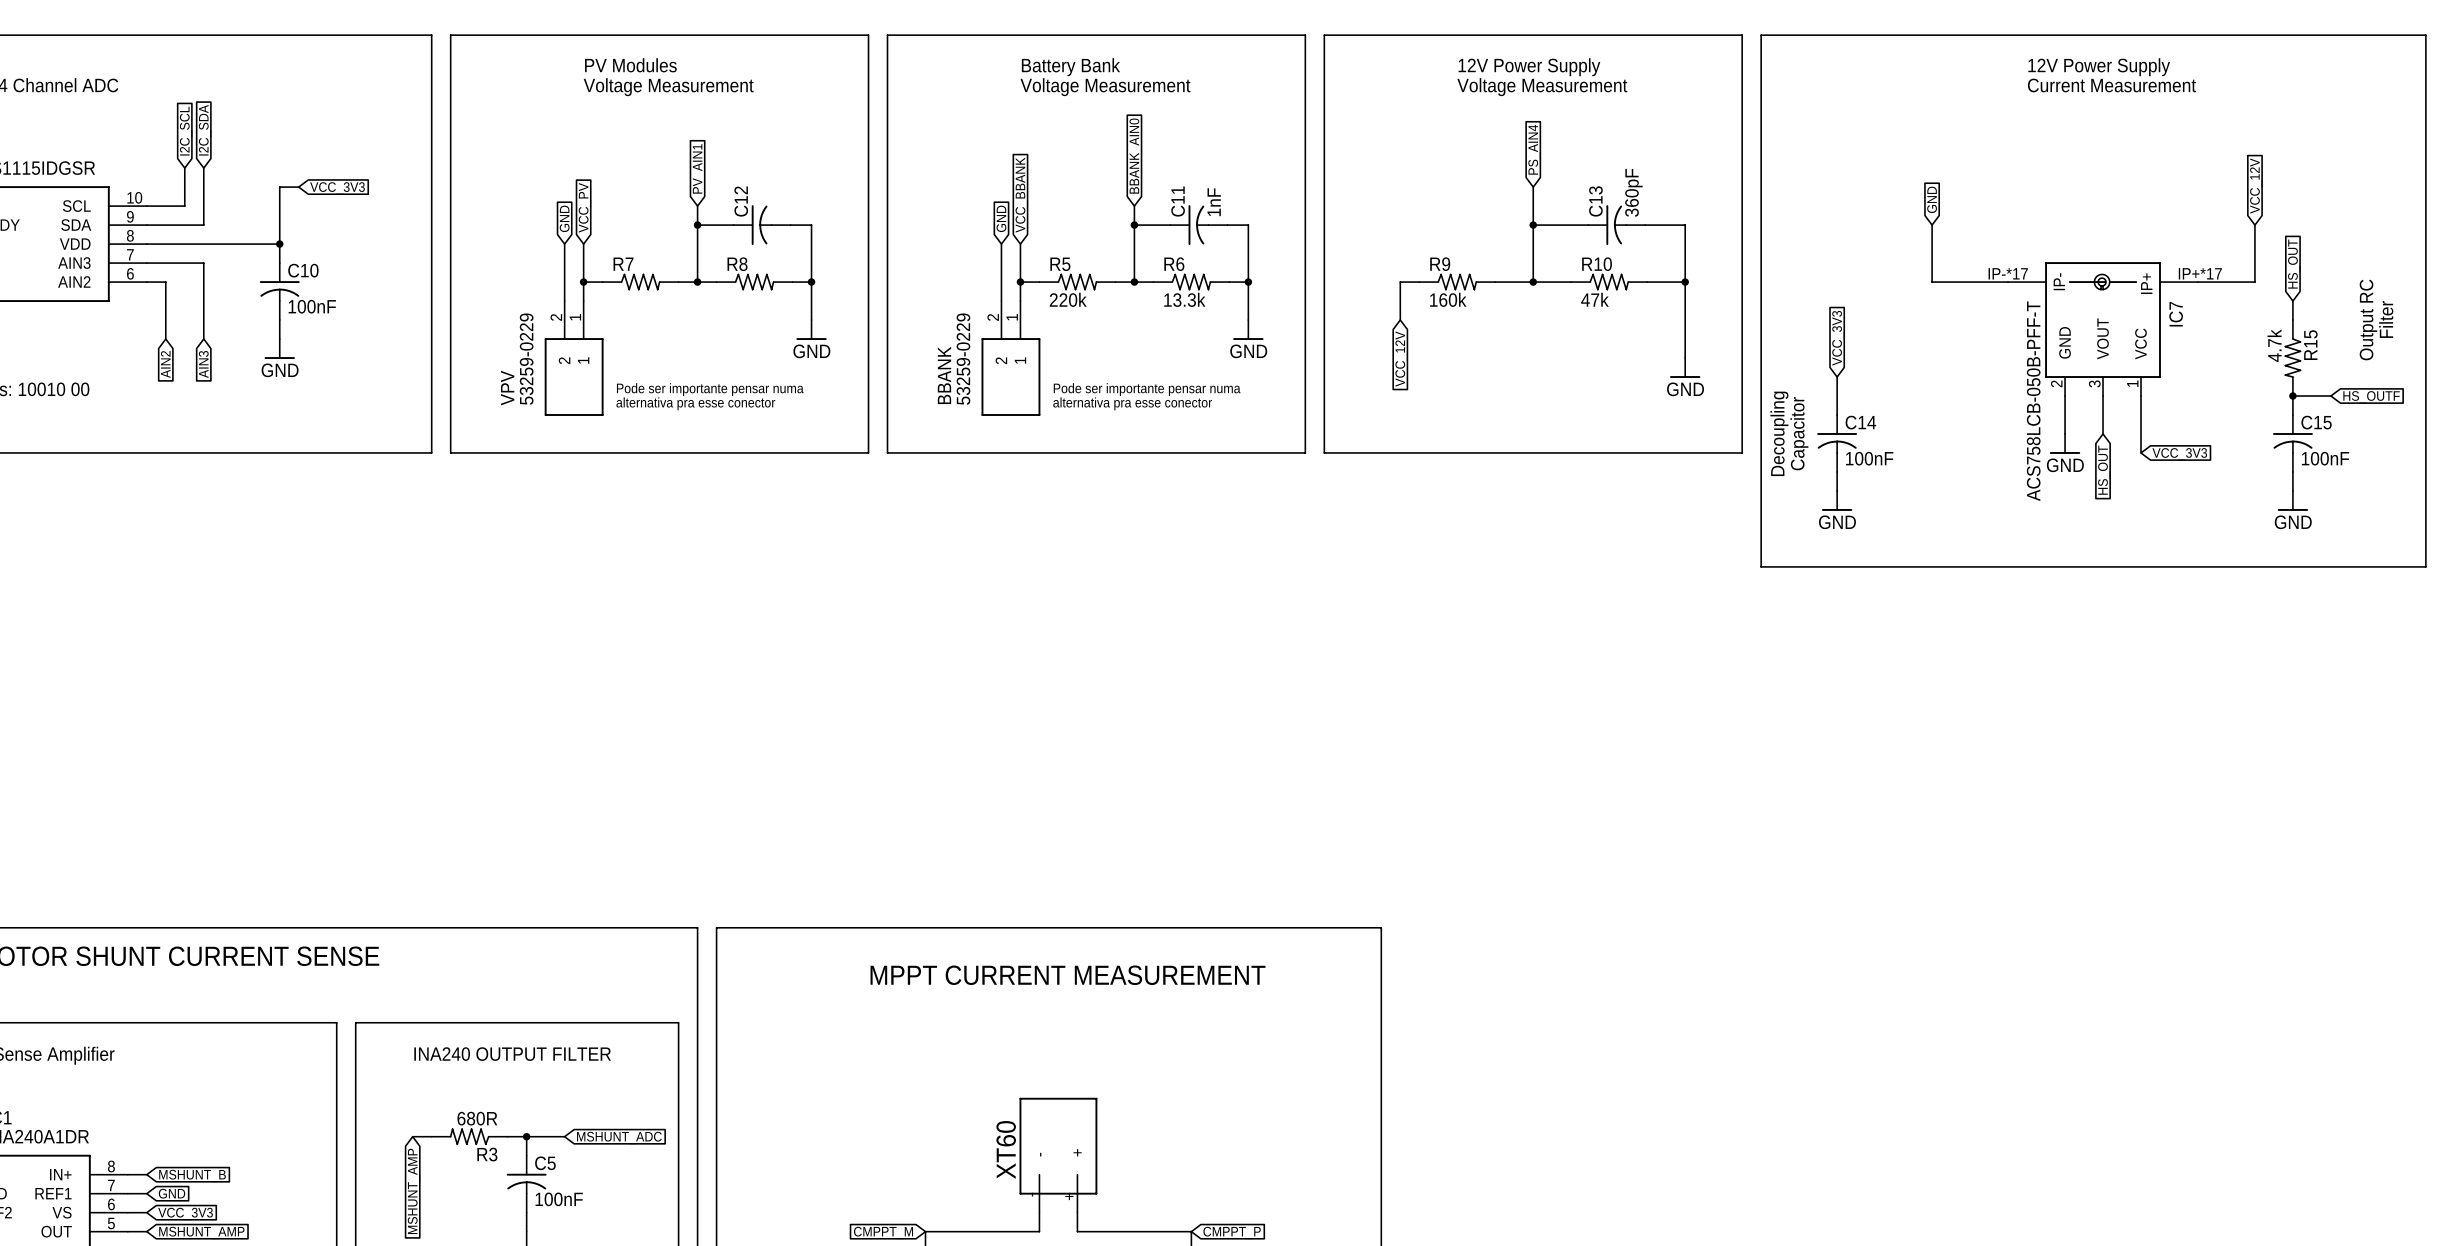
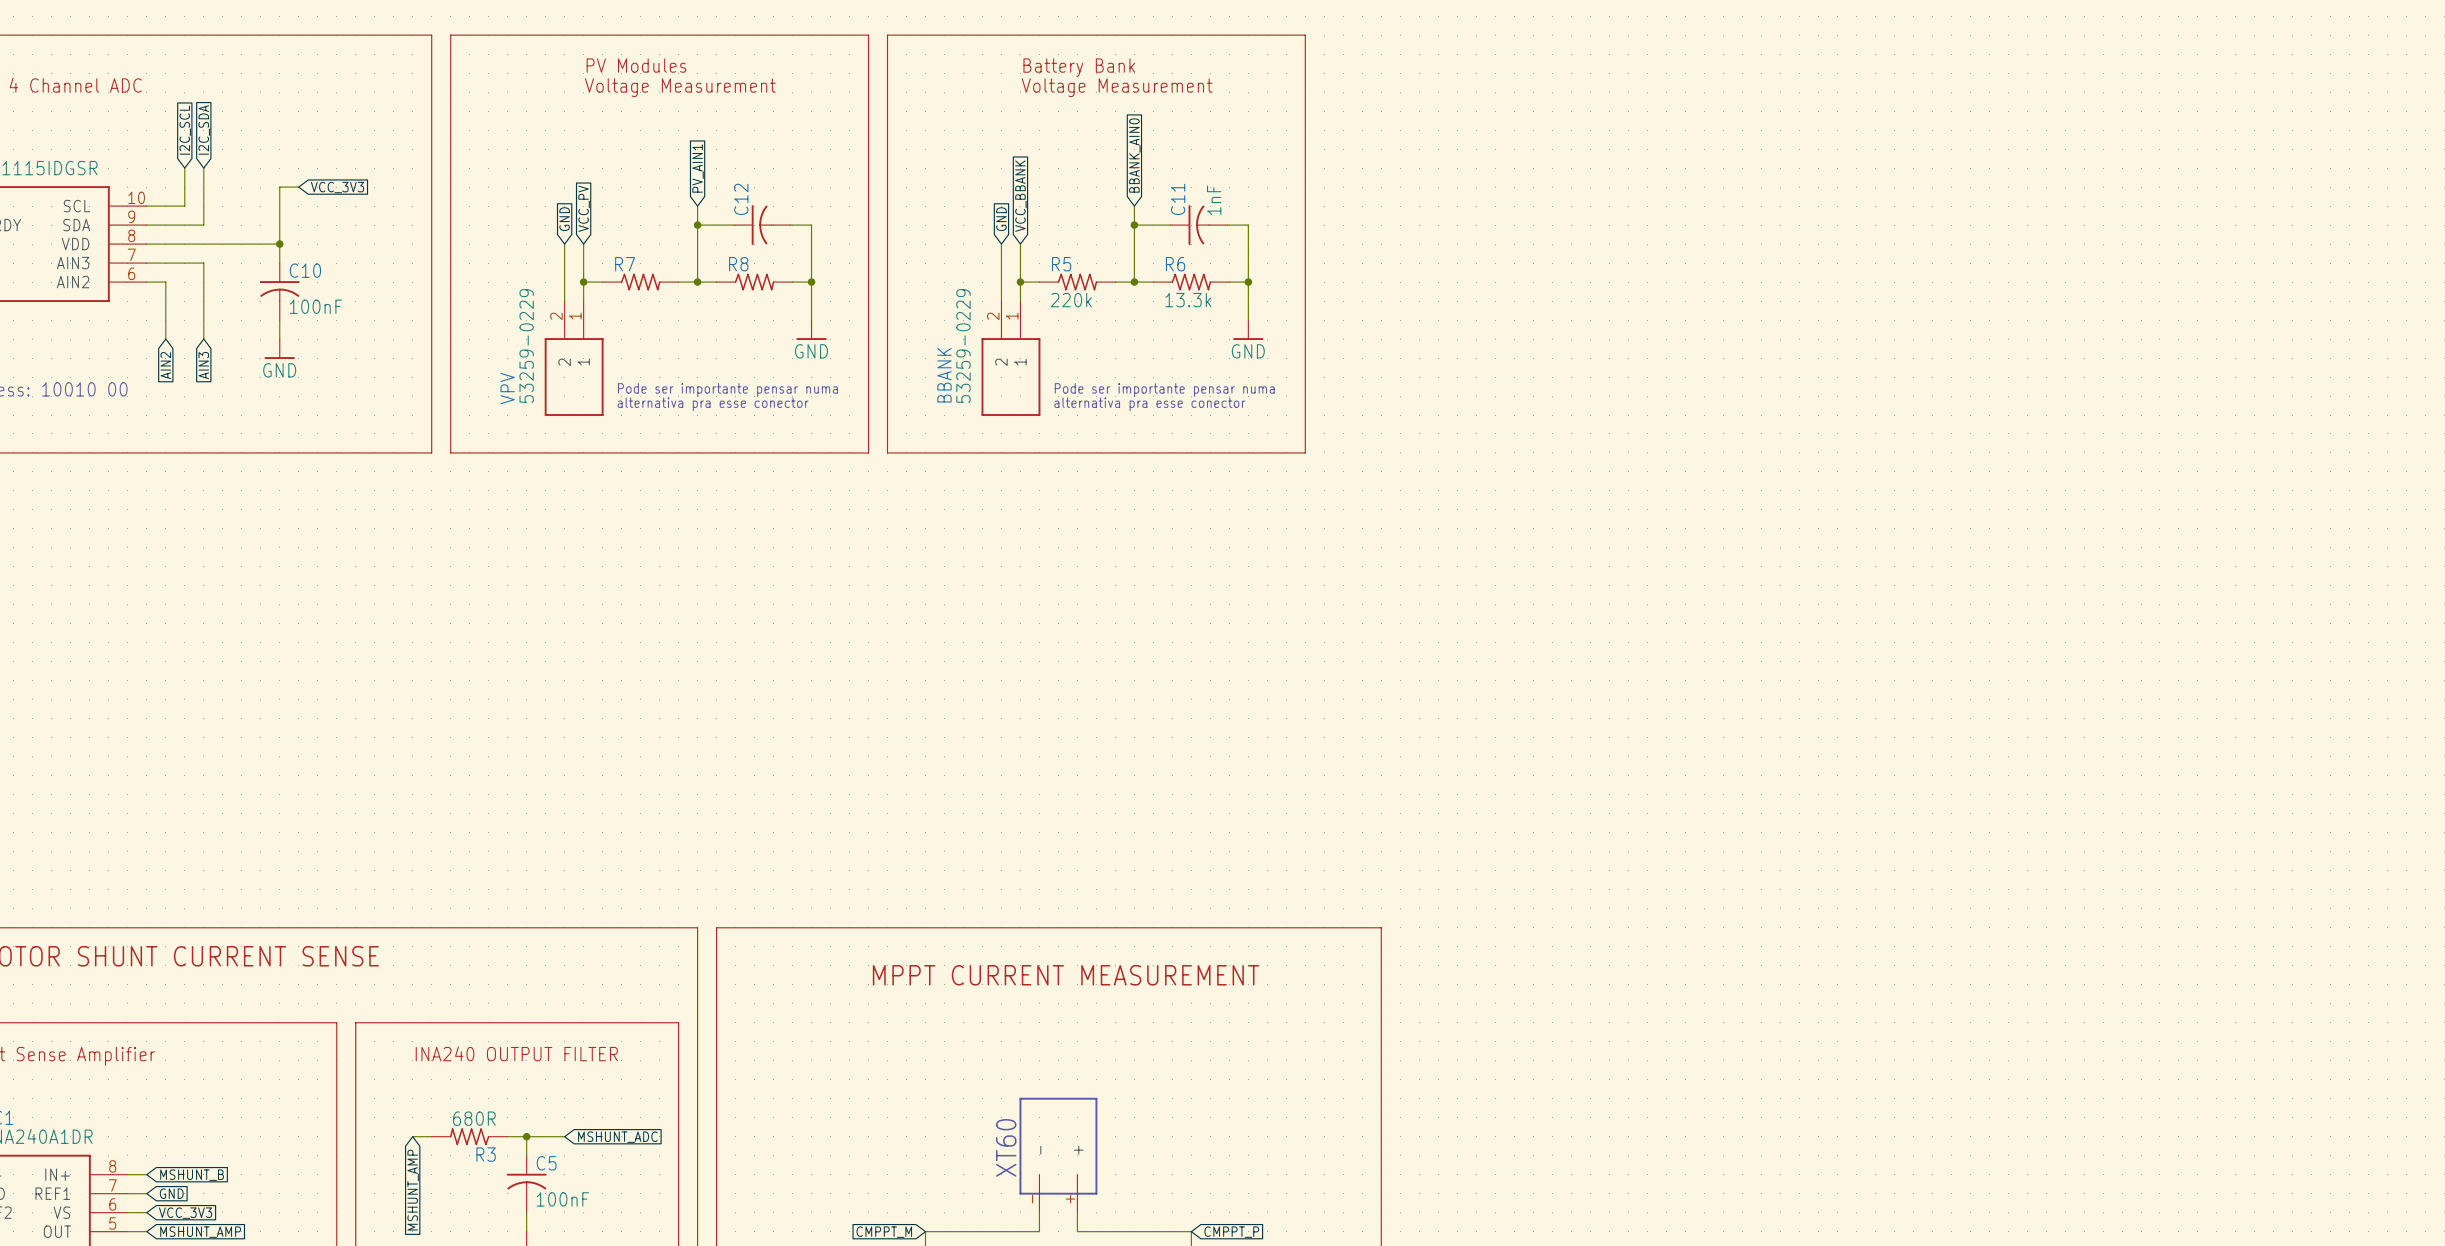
line: (1324, 35) (1324, 452) (1742, 452) (1742, 35) (1324, 35) -> none
line: (1761, 35) (2425, 35) (2425, 566) (1761, 566) (1761, 35) -> none
text: 12V Power Supply (1529, 67) -> none
text: 12V Power Supply (2099, 67) -> none
text: Current Measurement (2112, 85) -> none
text: Voltage Measurement (1542, 87) -> none
global label: PS_AIN4 (1534, 149) -> none
global label: VCC_12V (2256, 186) -> none
wire: (1533, 187) (1533, 282) -> none
global label: GND (1932, 199) -> none
wire: (1533, 225) (1588, 225) -> none
junction: (1533, 225) -> none
C13: 360pF (1616, 225) -> none
wire: (1645, 225) (1685, 225) (1685, 358) -> none
wire: (1932, 225) (1932, 282) (2008, 282) -> none
wire: (2254, 225) (2254, 282) (2197, 282) -> none
global label: HS_OUT (2294, 264) -> none
wire: (1419, 282) (1400, 282) (1400, 320) -> none
R9: 160k (1457, 282) -> none
wire: (1495, 282) (1571, 282) -> none
junction: (1533, 282) -> none
R10: 47k (1609, 282) -> none
wire: (1647, 282) (1685, 282) -> none
junction: (1685, 282) -> none
wire: (2292, 301) (2292, 320) -> none
text: Output RC (2368, 319) -> none
text: Filter (2386, 319) -> none
IC7: ACS758LCB-050B-PFF-T (2103, 329) -> none
global label: VCC_3V3 (1838, 338) -> none
R15: 4.7k (2292, 358) -> none
global label: VCC_12V (1401, 359) -> none
power symbol: GND (1685, 367) -> none
wire: (1837, 377) (1837, 415) -> none
wire: (2065, 396) (2065, 433) -> none
wire: (2103, 396) (2103, 433) -> none
wire: (2141, 396) (2141, 452) -> none
junction: (2292, 396) -> none
wire: (2330, 396) (2292, 396) (2292, 415) -> none
global label: HS_OUTF (2371, 397) -> none
text: Decoupling (1779, 433) -> none
text: Capacitor (1799, 433) -> none
C14: 100nF (1837, 443) -> none
power symbol: GND (2065, 443) -> none
C15: 100nF (2292, 443) -> none
global label: VCC_3V3 (2179, 454) -> none
global label: HS_OUT (2104, 470) -> none
wire: (1837, 471) (1837, 490) -> none
wire: (2292, 471) (2292, 490) -> none
power symbol: GND (1837, 500) -> none
power symbol: GND (2292, 500) -> none

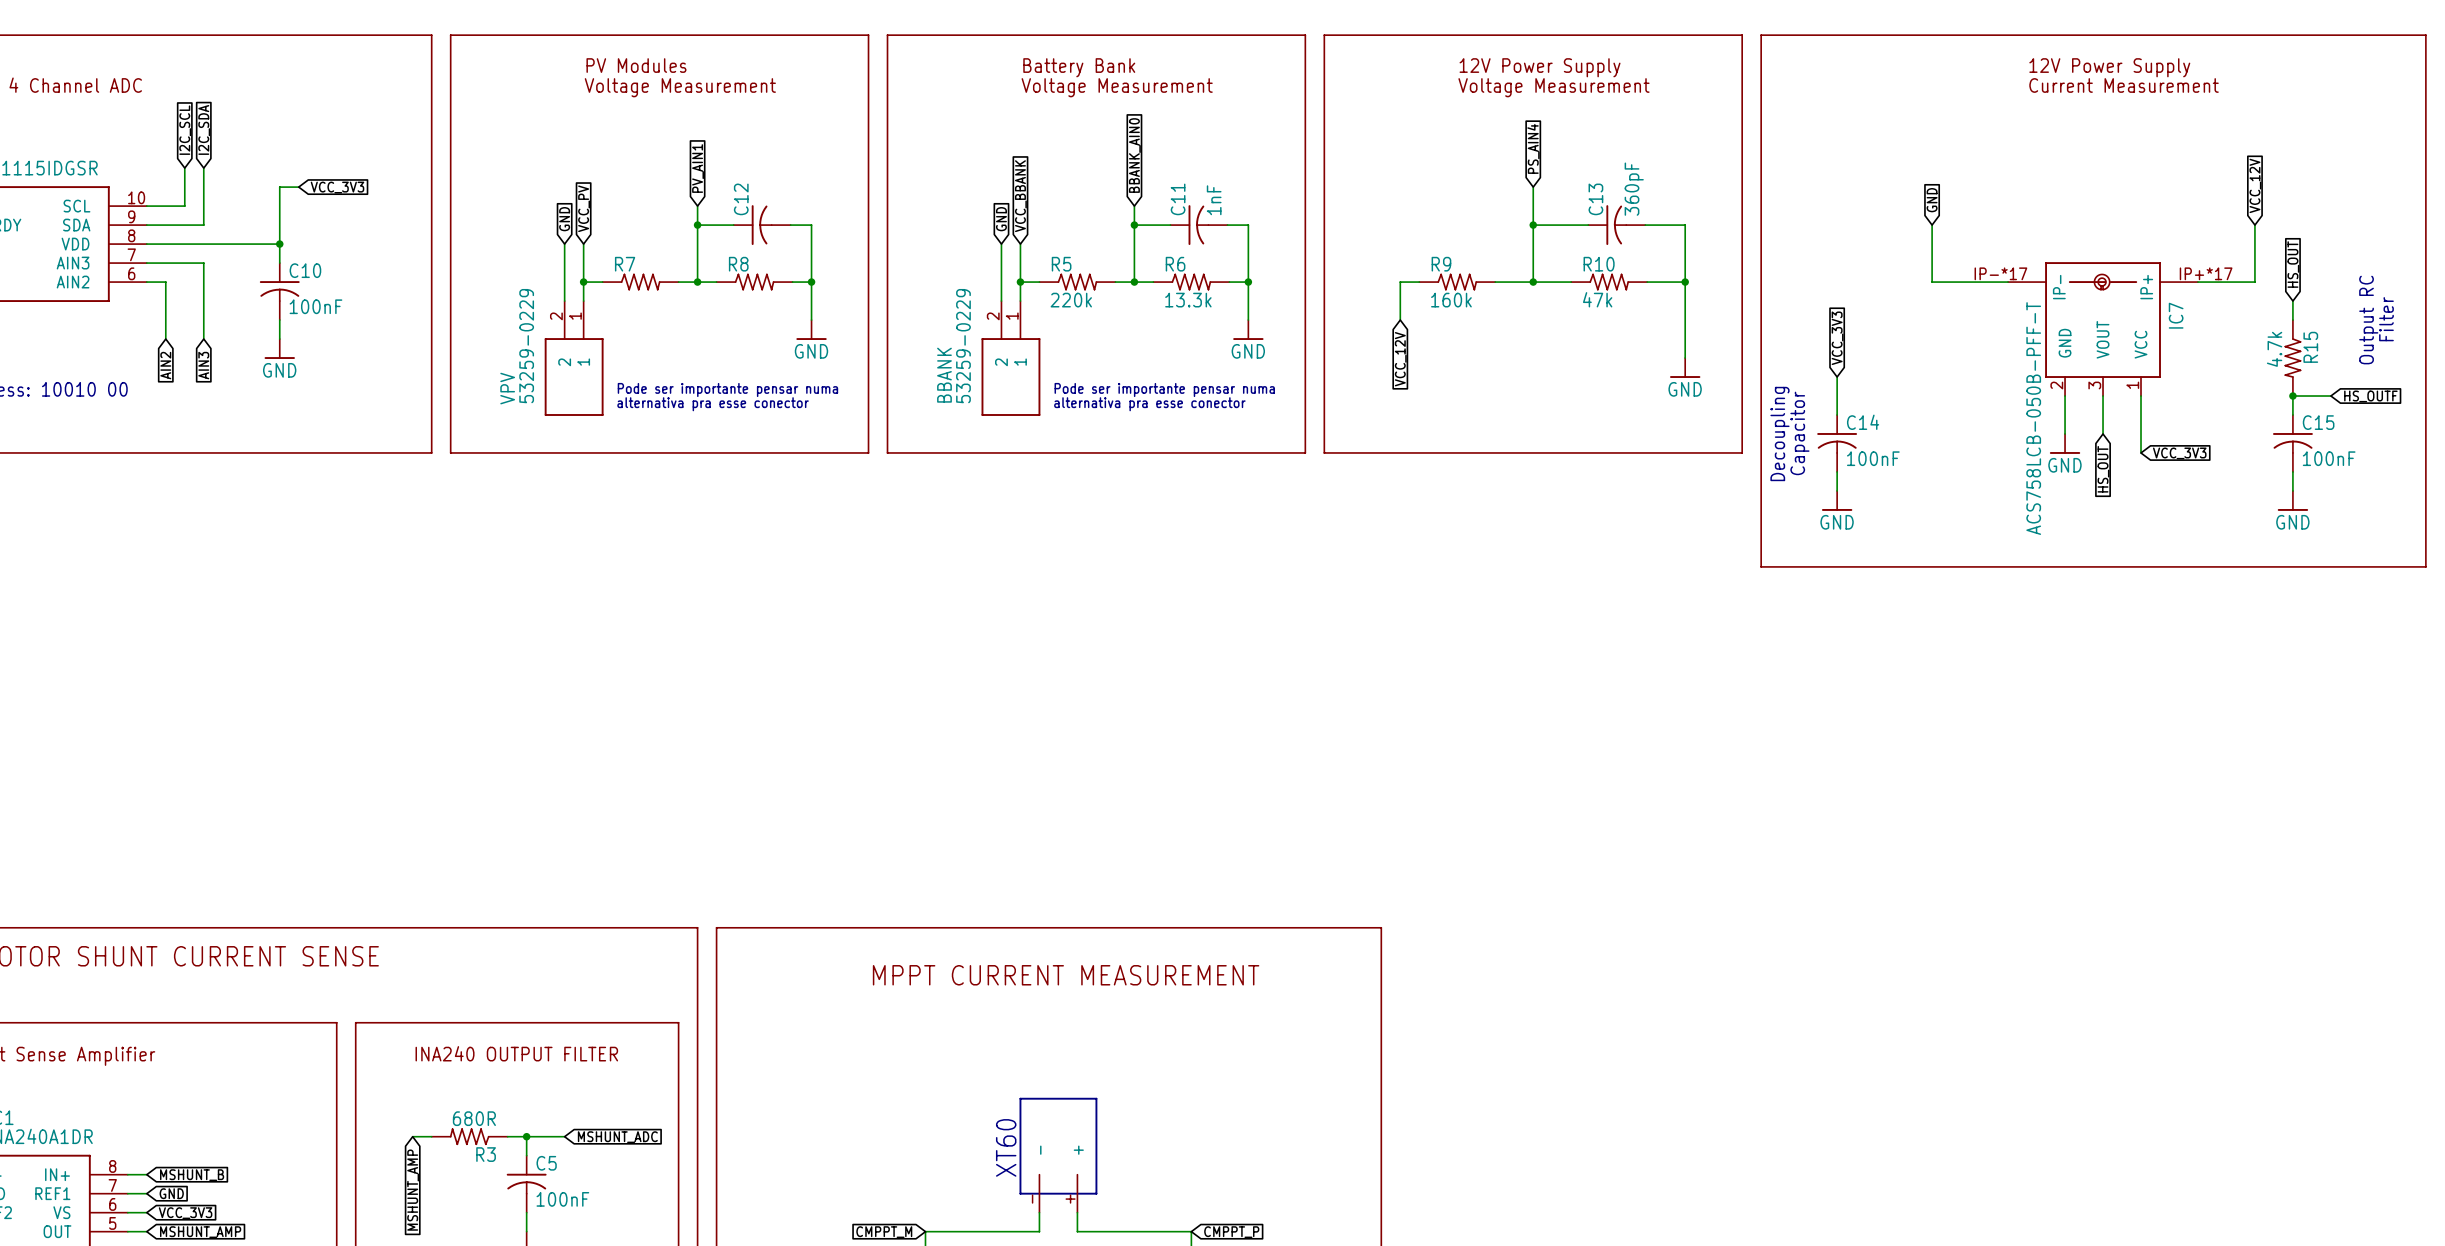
line: none -> (1324, 35) (1324, 452) (1742, 452) (1742, 35) (1324, 35)
line: none -> (1761, 35) (2425, 35) (2425, 566) (1761, 566) (1761, 35)
text: none -> 12V Power Supply (1540, 67)
text: none -> 12V Power Supply (2109, 67)
text: none -> Current Measurement (2124, 85)
text: none -> Voltage Measurement (1553, 87)
global label: none -> PS_AIN4 (1533, 148)
global label: none -> VCC_12V (2255, 185)
wire: none -> (1533, 187) (1533, 282)
global label: none -> GND (1932, 200)
wire: none -> (1533, 225) (1588, 225)
junction: none -> (1533, 225)
C13: none -> 360pF (1616, 225)
wire: none -> (1645, 225) (1685, 225) (1685, 358)
wire: none -> (1932, 225) (1932, 282) (2008, 282)
wire: none -> (2254, 225) (2254, 282) (2197, 282)
global label: none -> HS_OUT (2293, 264)
wire: none -> (1419, 282) (1400, 282) (1400, 320)
R9: none -> 160k (1457, 282)
wire: none -> (1495, 282) (1571, 282)
junction: none -> (1533, 282)
R10: none -> 47k (1609, 282)
wire: none -> (1647, 282) (1685, 282)
junction: none -> (1685, 282)
wire: none -> (2292, 301) (2292, 320)
text: none -> Filter (2386, 319)
text: none -> Output RC (2368, 320)
IC7: none -> ACS758LCB-050B-PFF-T (2103, 329)
global label: none -> VCC_3V3 (1837, 338)
R15: none -> 4.7k (2292, 358)
global label: none -> VCC_12V (1400, 359)
power symbol: none -> GND (1685, 367)
wire: none -> (1837, 377) (1837, 415)
wire: none -> (2065, 396) (2065, 433)
wire: none -> (2103, 396) (2103, 433)
wire: none -> (2141, 396) (2141, 452)
junction: none -> (2292, 396)
wire: none -> (2330, 396) (2292, 396) (2292, 415)
global label: none -> HS_OUTF (2370, 396)
text: none -> Decoupling (1779, 433)
text: none -> Capacitor (1799, 433)
C14: none -> 100nF (1837, 443)
power symbol: none -> GND (2065, 443)
C15: none -> 100nF (2292, 443)
global label: none -> VCC_3V3 (2179, 453)
global label: none -> HS_OUT (2103, 469)
wire: none -> (1837, 471) (1837, 490)
wire: none -> (2292, 471) (2292, 490)
power symbol: none -> GND (1837, 500)
power symbol: none -> GND (2292, 500)

